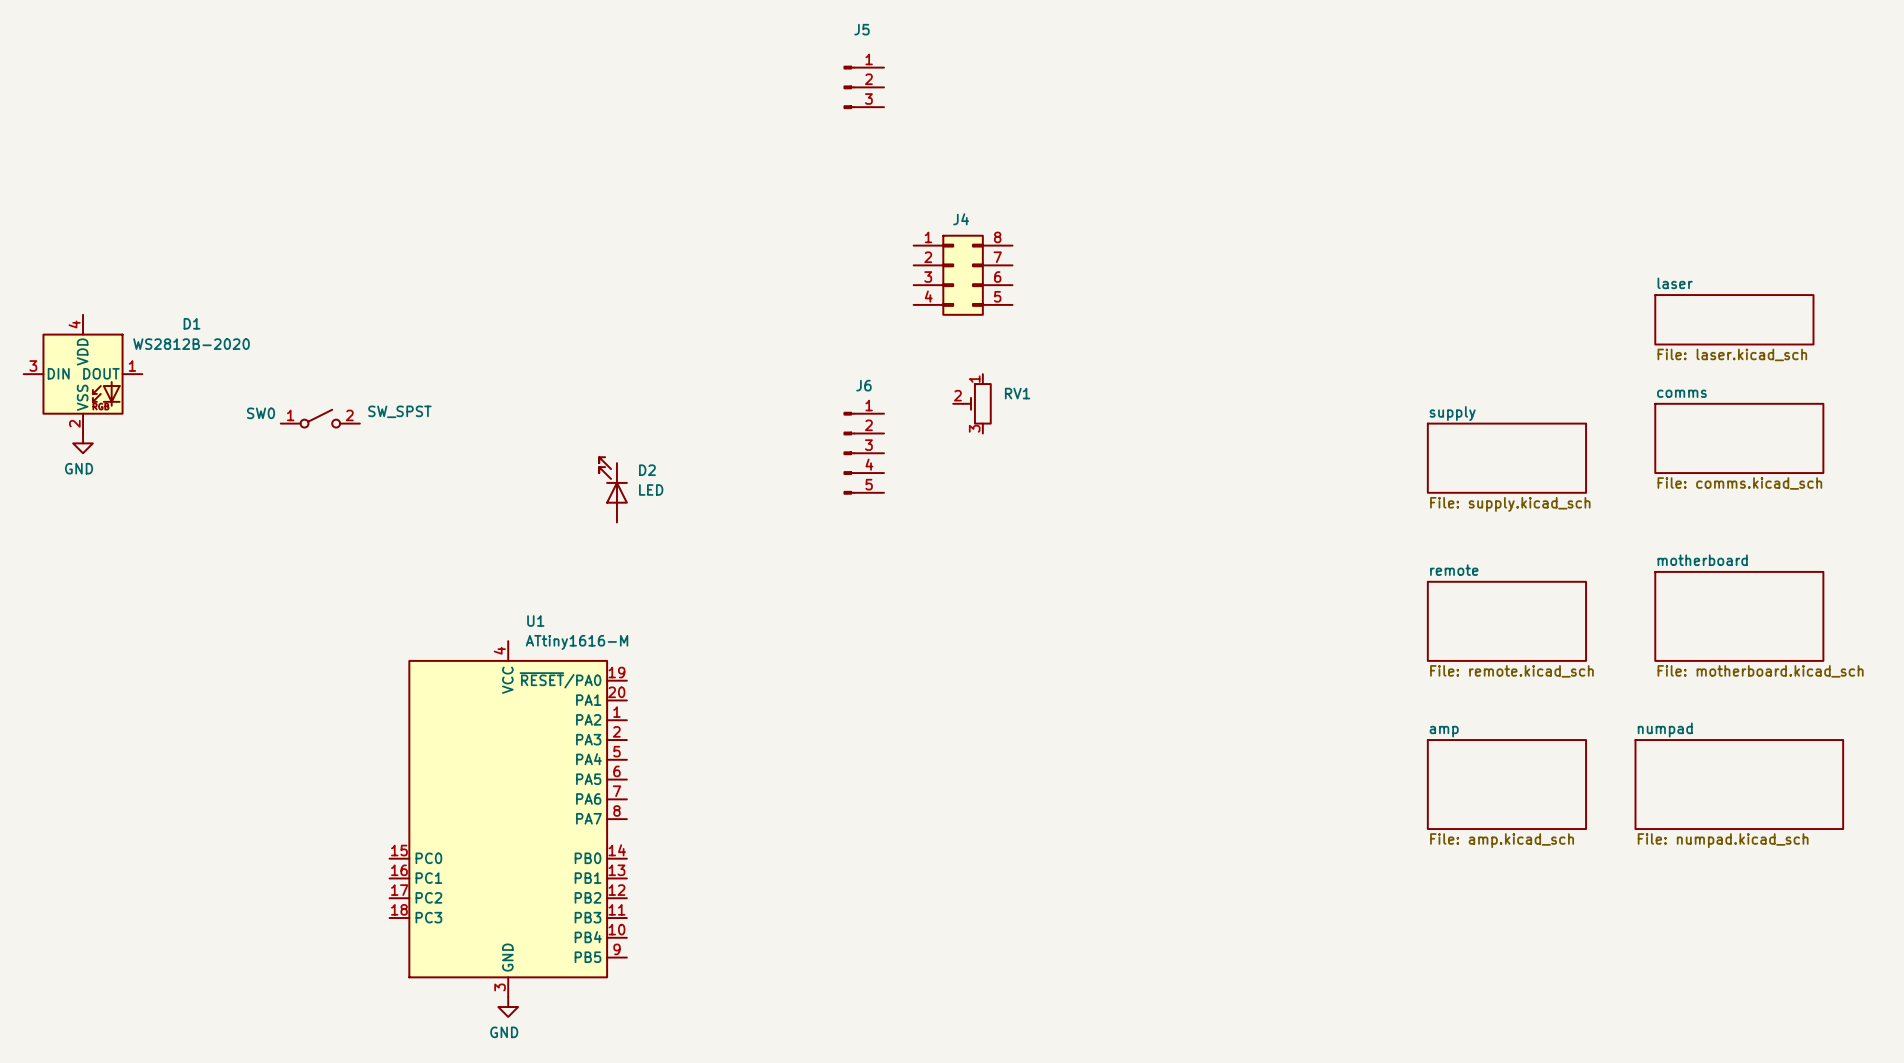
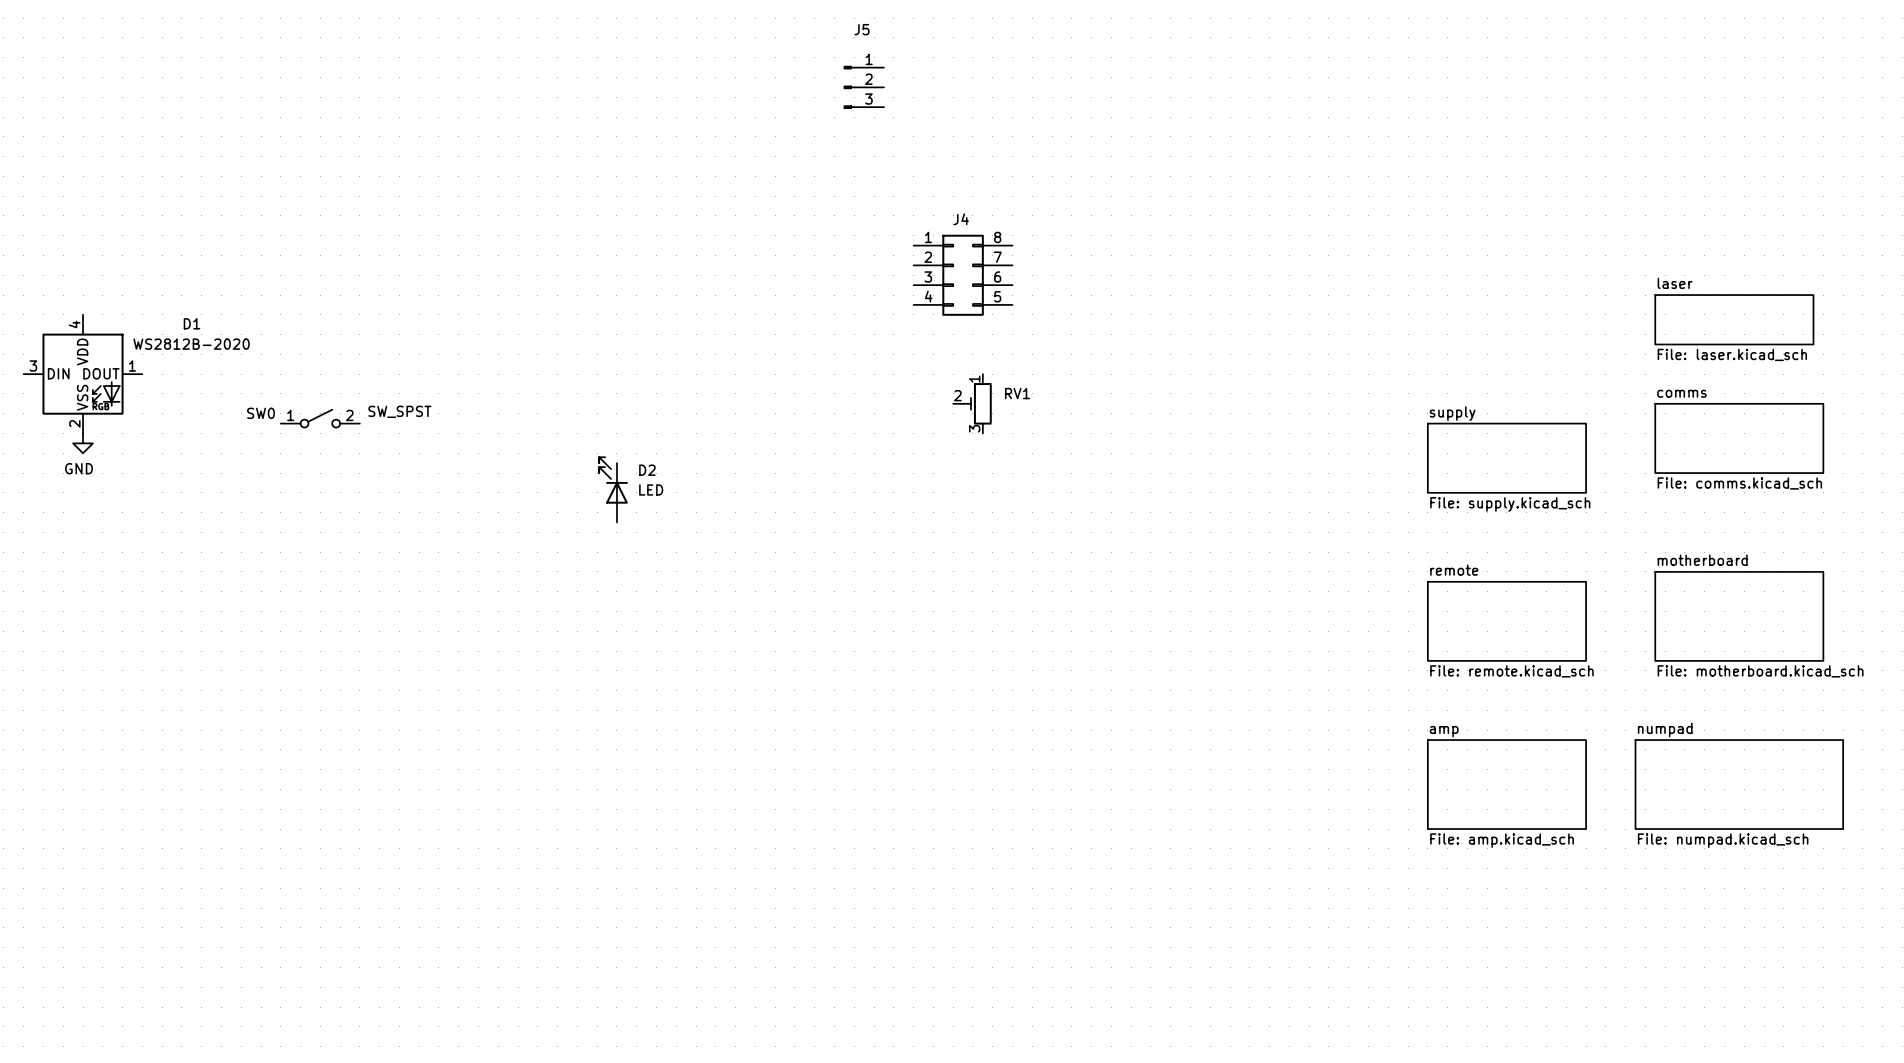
J6: (863, 453) -> none
U1: ATtiny1616-M (508, 819) -> none
power symbol: GND (508, 1007) -> none

